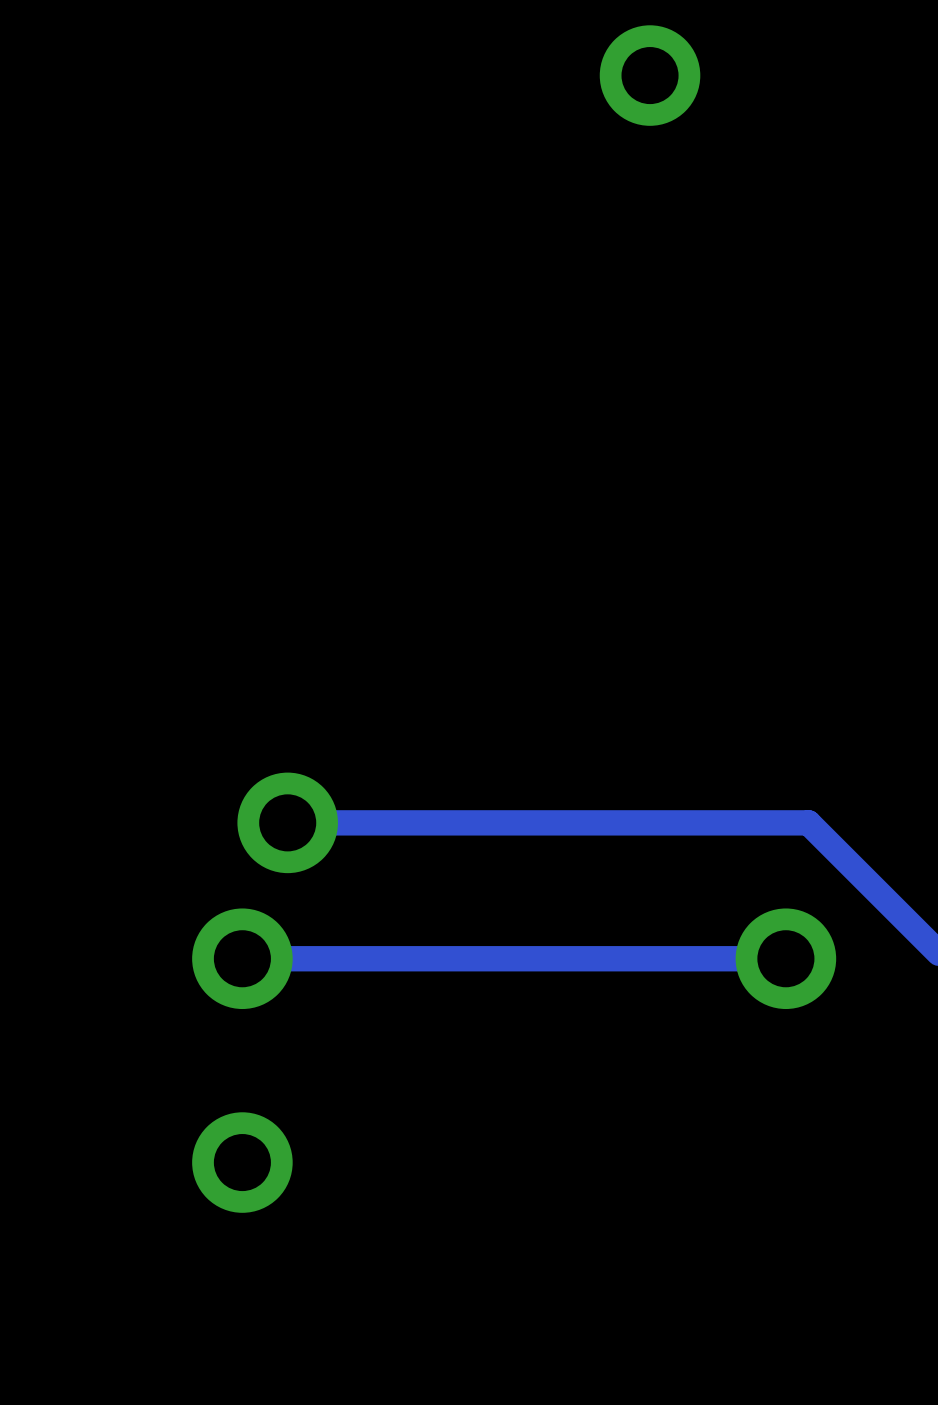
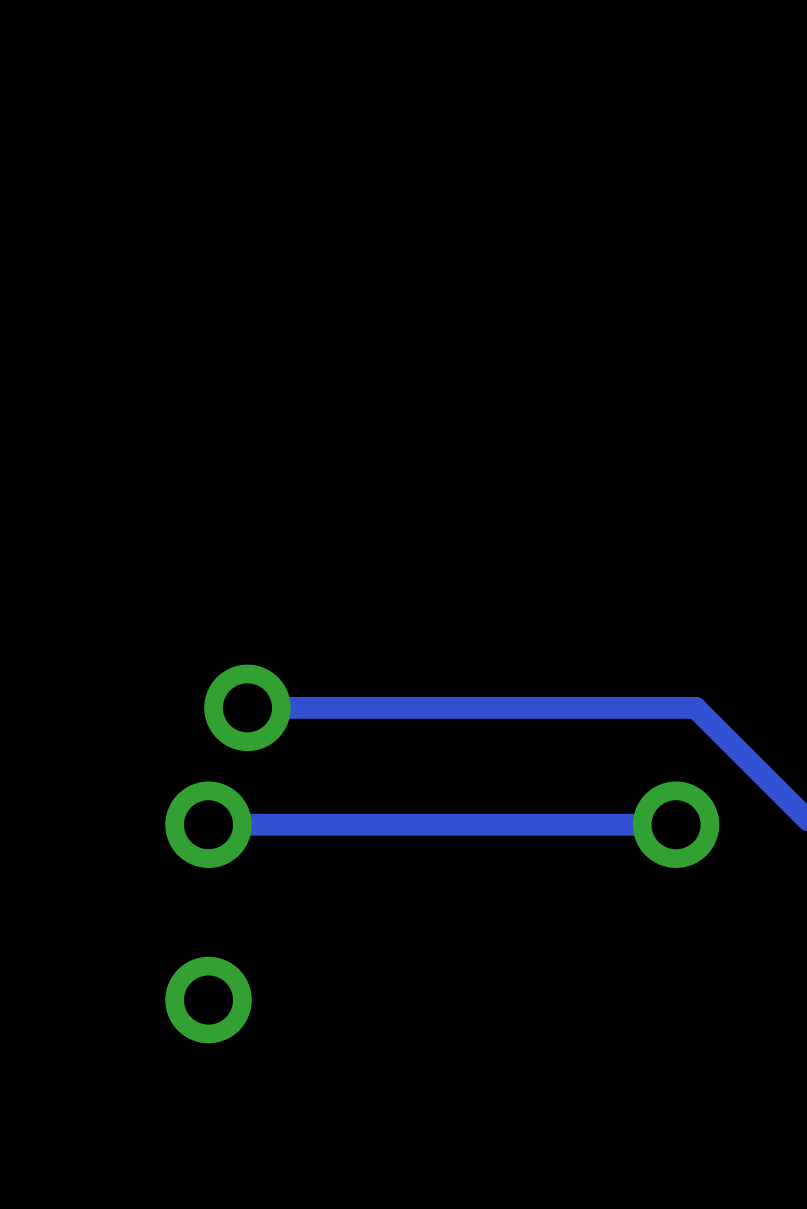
via: (650, 75) -> none

